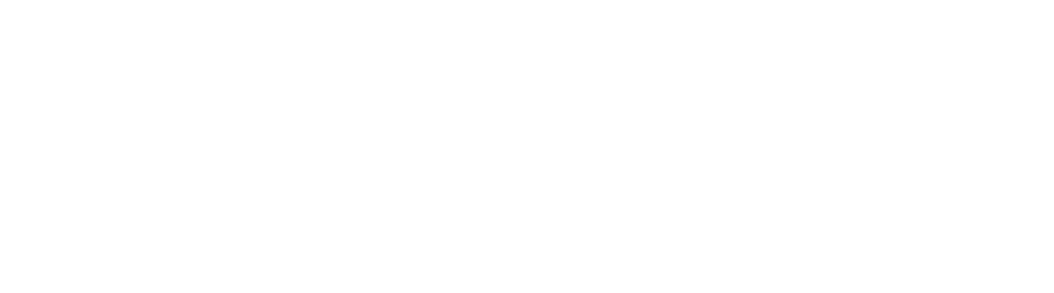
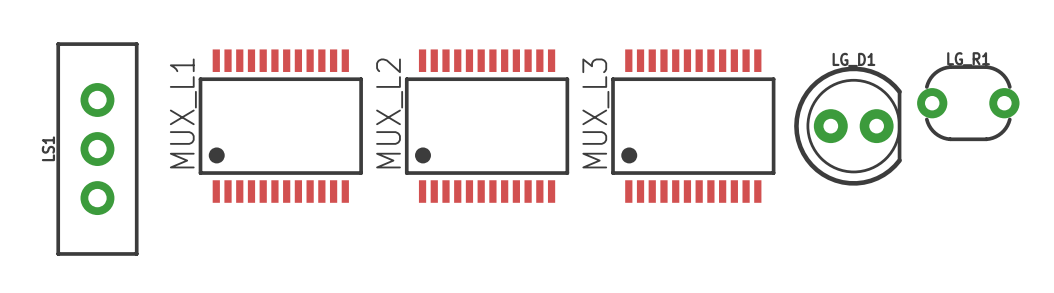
LG_R1: none -> (968, 103)
MUX_L1: none -> (280, 126)
MUX_L2: none -> (487, 126)
MUX_L3: none -> (693, 126)
LG_D1: none -> (847, 126)
LS1: none -> (97, 149)

